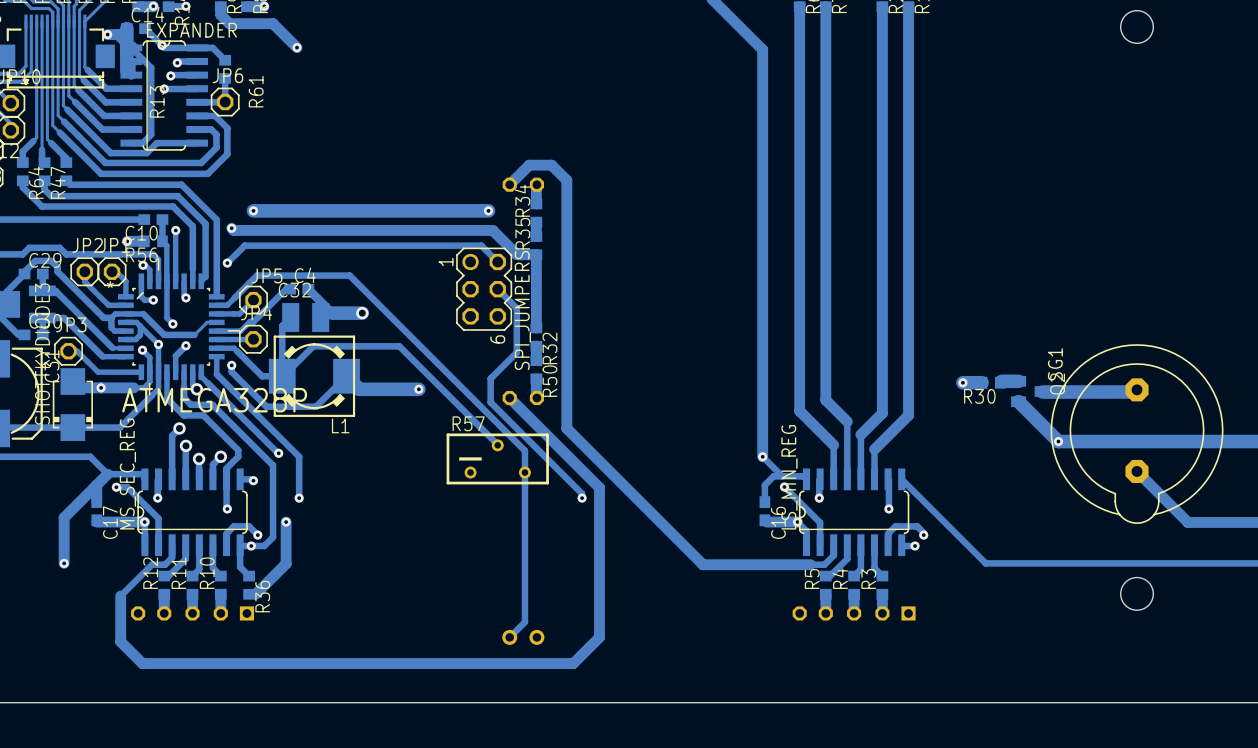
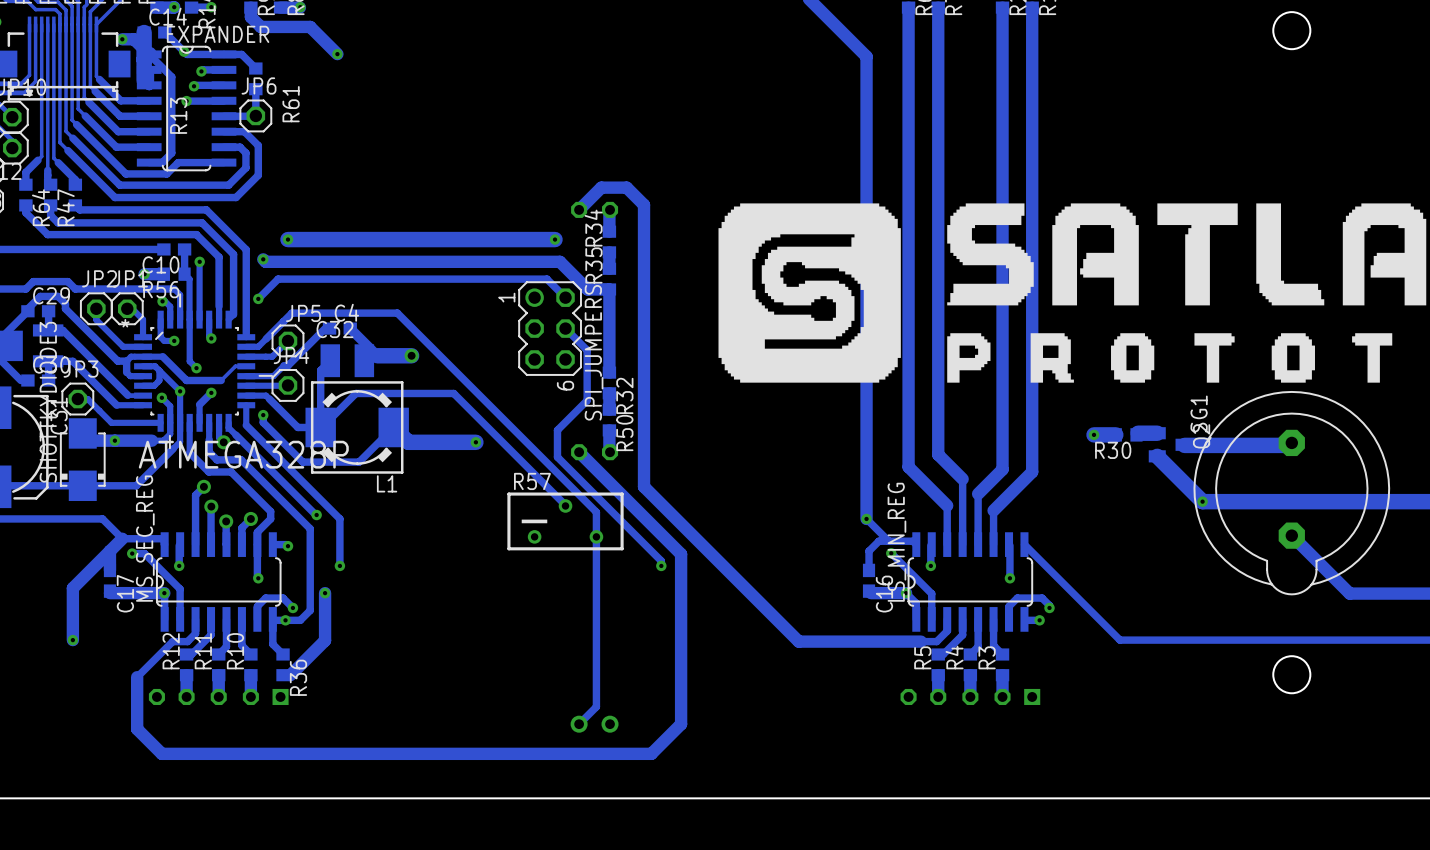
drawing: none -> [718, 203, 901, 383]
drawing: none -> [947, 203, 1034, 306]
drawing: none -> [1052, 203, 1139, 306]
drawing: none -> [1157, 203, 1238, 306]
drawing: none -> [1256, 203, 1325, 306]
drawing: none -> [1342, 203, 1427, 306]
drawing: none -> [947, 333, 991, 383]
drawing: none -> [1030, 333, 1074, 383]
drawing: none -> [1111, 333, 1155, 383]
drawing: none -> [1194, 333, 1235, 383]
drawing: none -> [1271, 333, 1315, 383]
drawing: none -> [1352, 333, 1393, 383]

